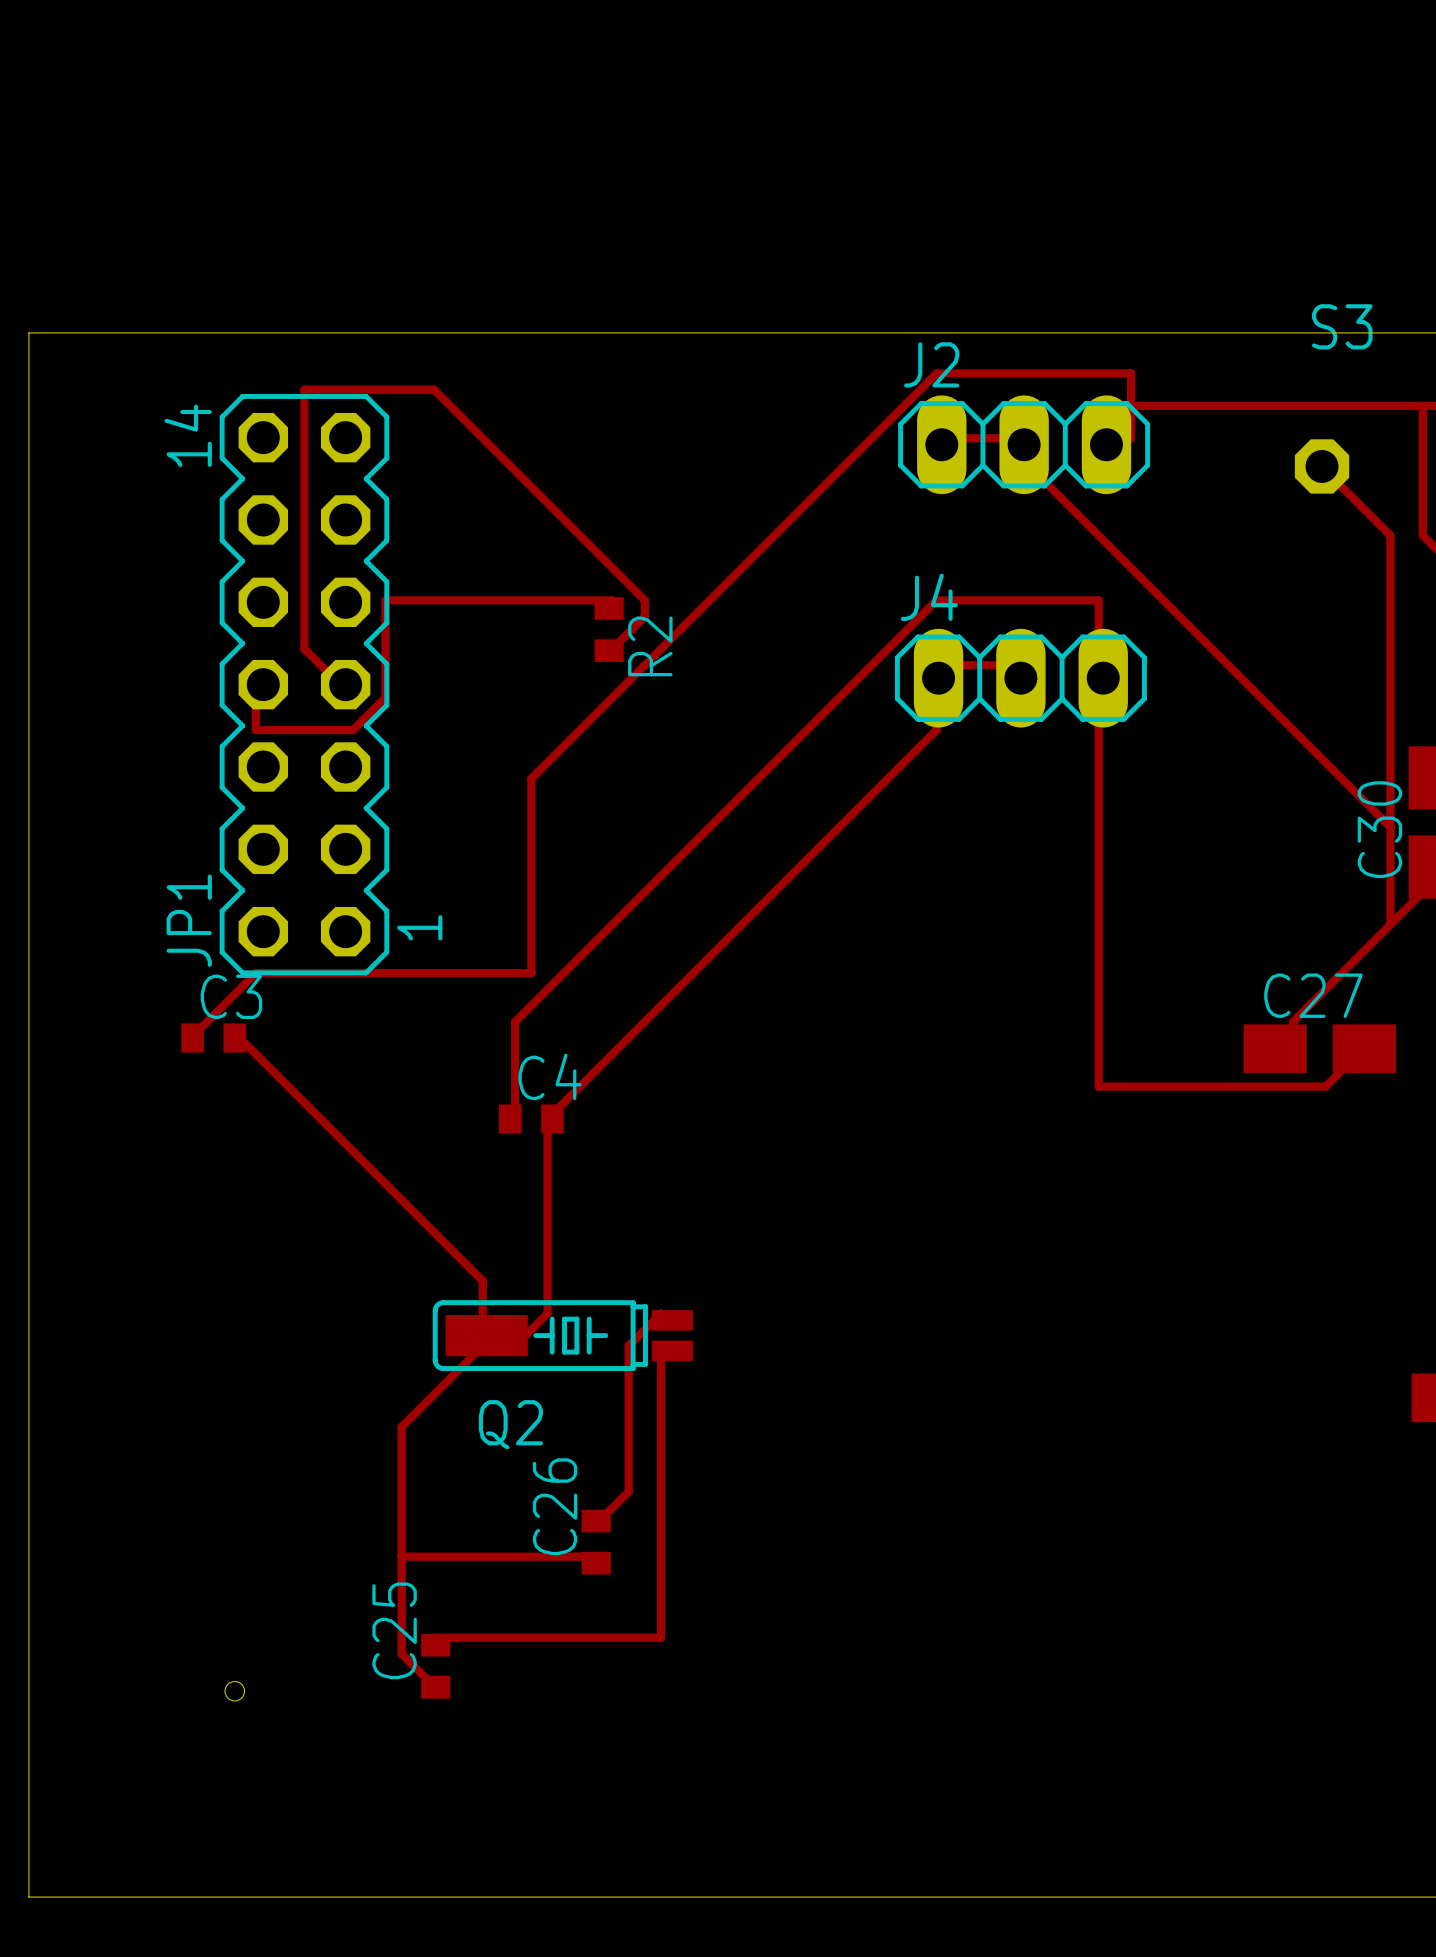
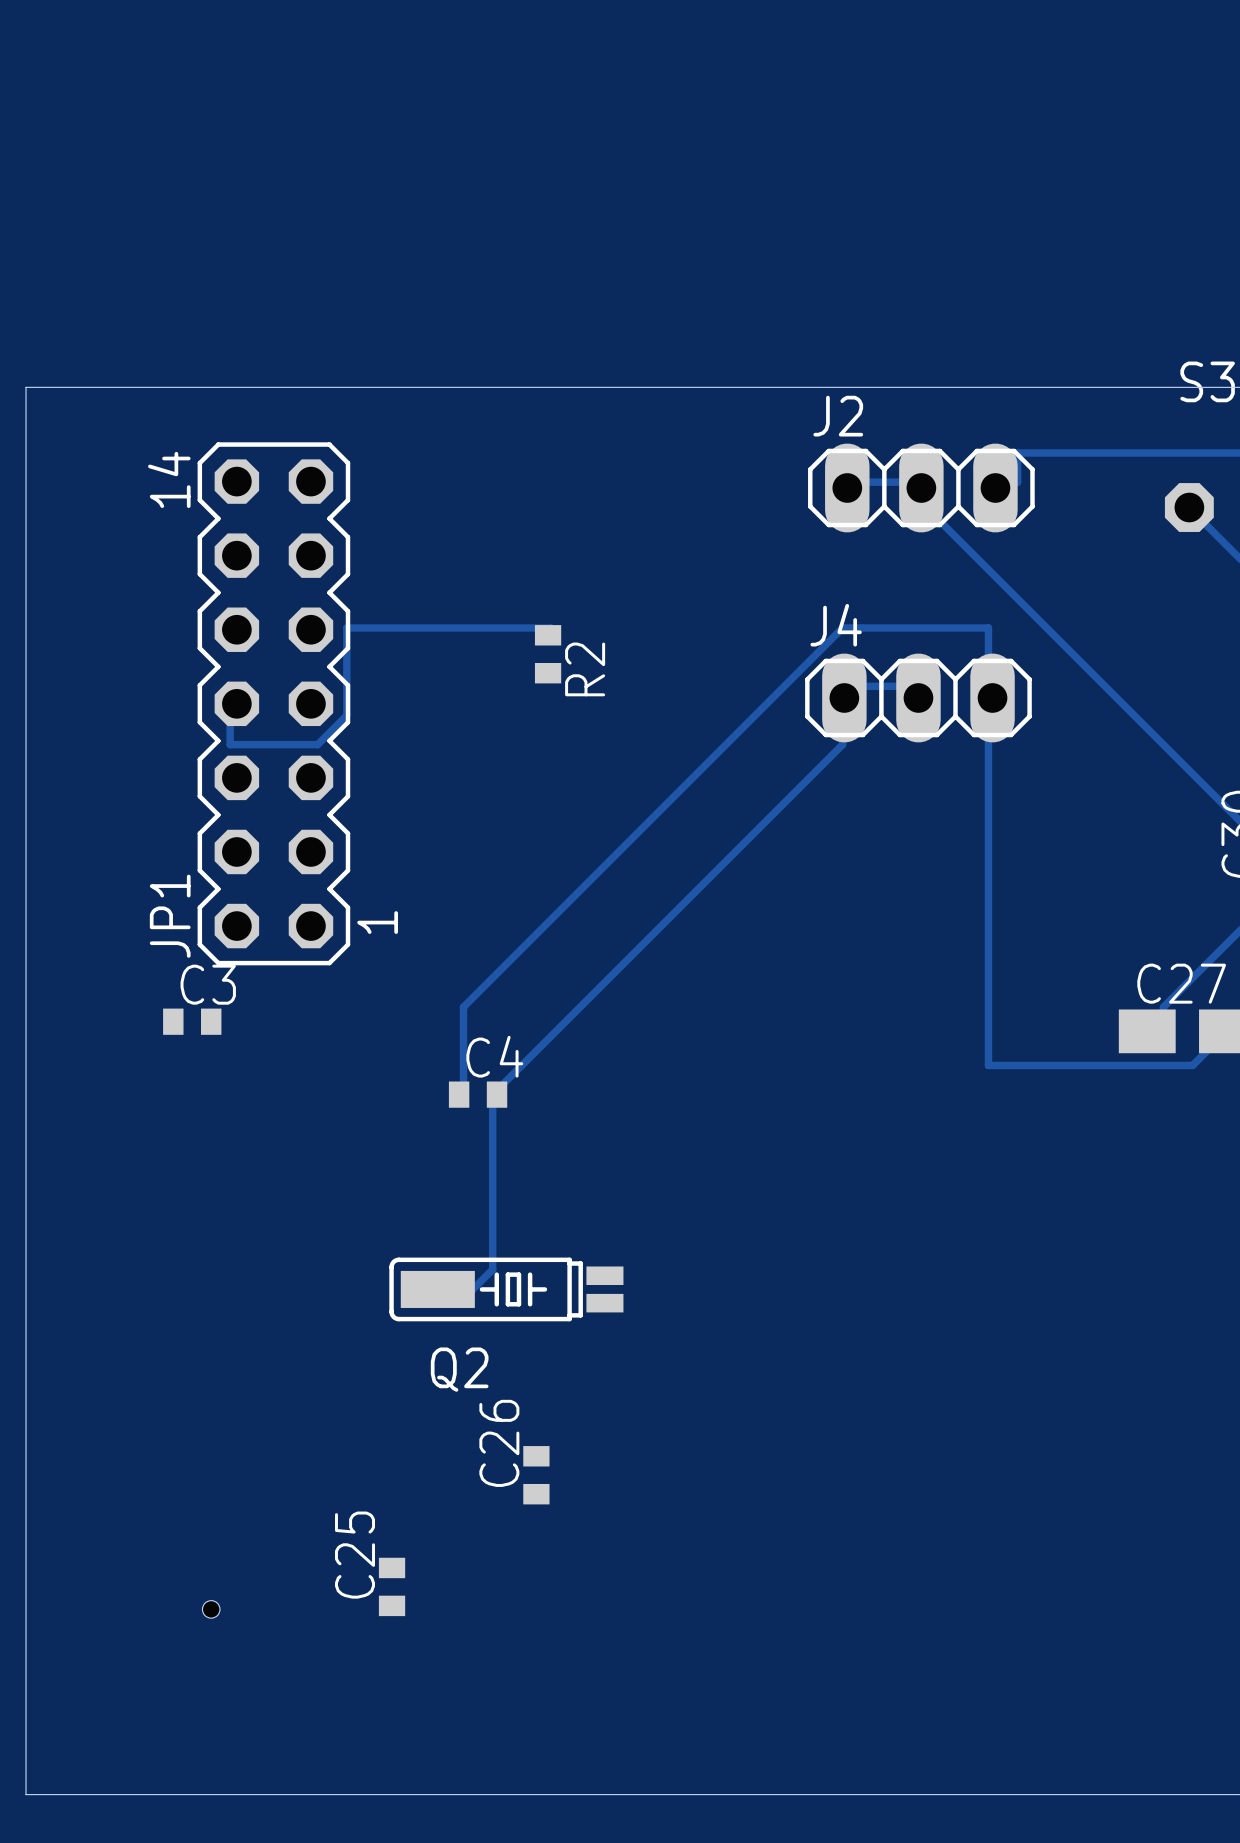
track: (1131, 405) (1131, 373) (936, 373) (531, 778) (531, 973) (255, 973) (191, 1038) (192, 1038) -> none
track: (609, 650) (644, 616) (644, 600) (434, 389) (304, 389) (304, 649) (336, 681) (345, 684) -> none
track: (234, 1038) (239, 1038) (482, 1281) (482, 1329) (486, 1335) (482, 1345) (401, 1427) (401, 1653) (435, 1687) -> none
track: (672, 1320) (661, 1313) (628, 1345) (628, 1491) (596, 1524) (596, 1521) -> none
track: (672, 1350) (661, 1345) (661, 1637) (434, 1637) (435, 1645) -> none
track: (401, 1556) (596, 1556) (596, 1563) -> none

